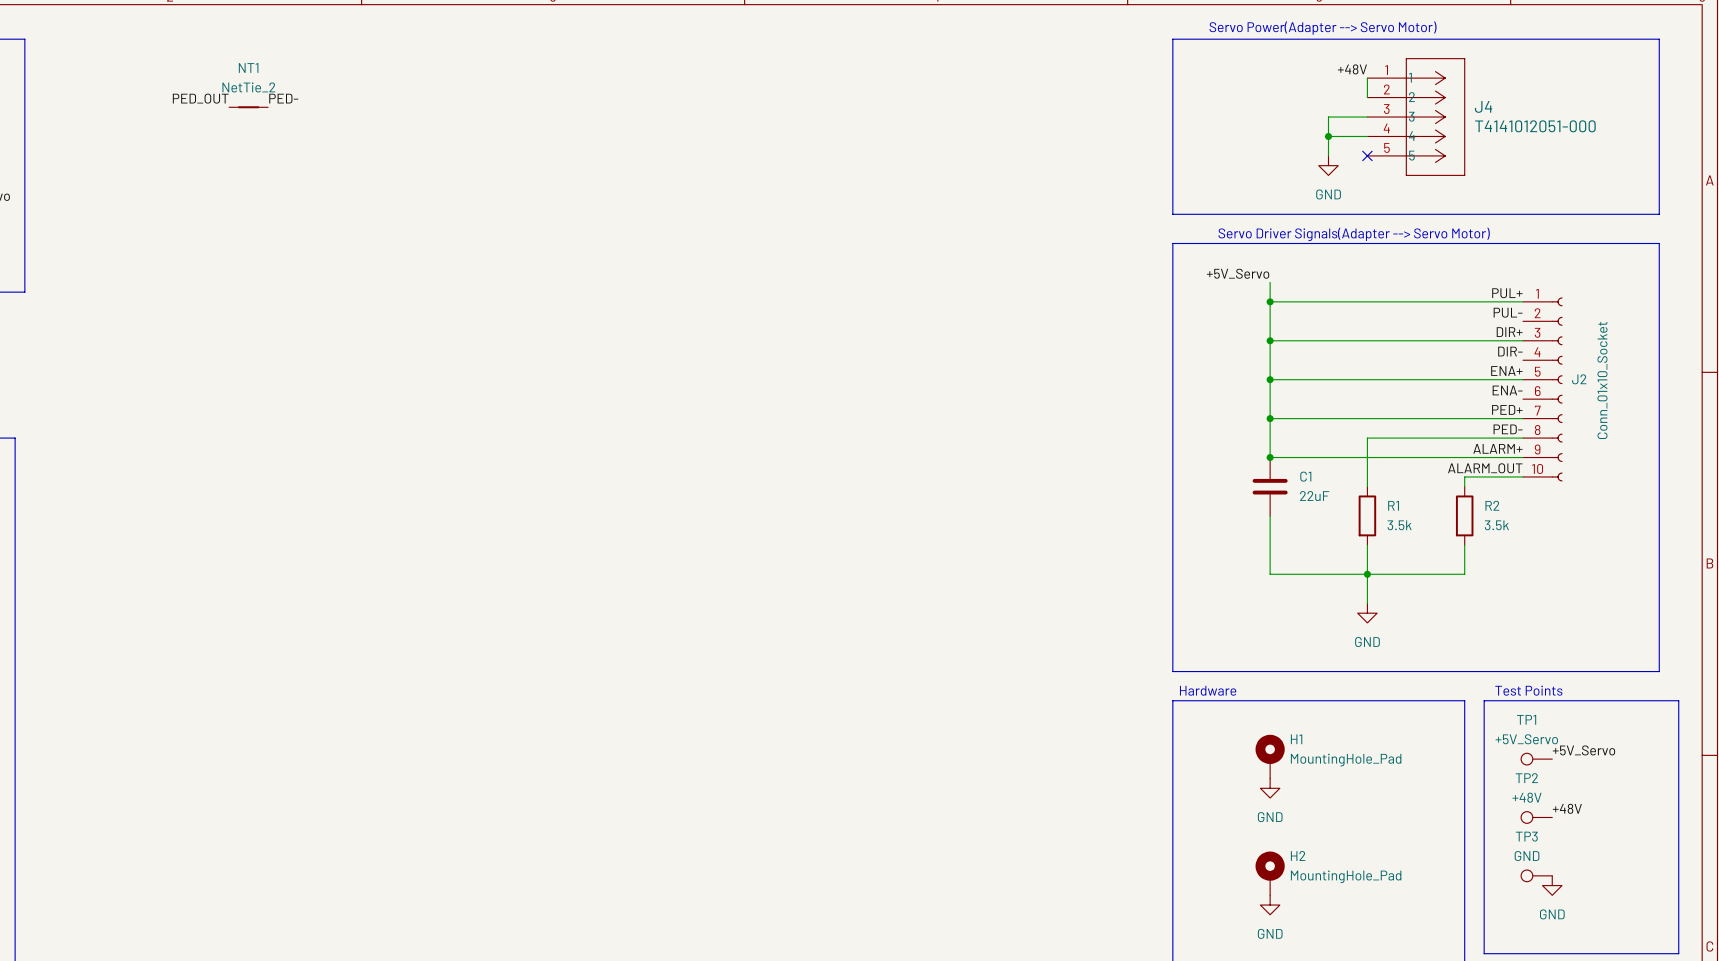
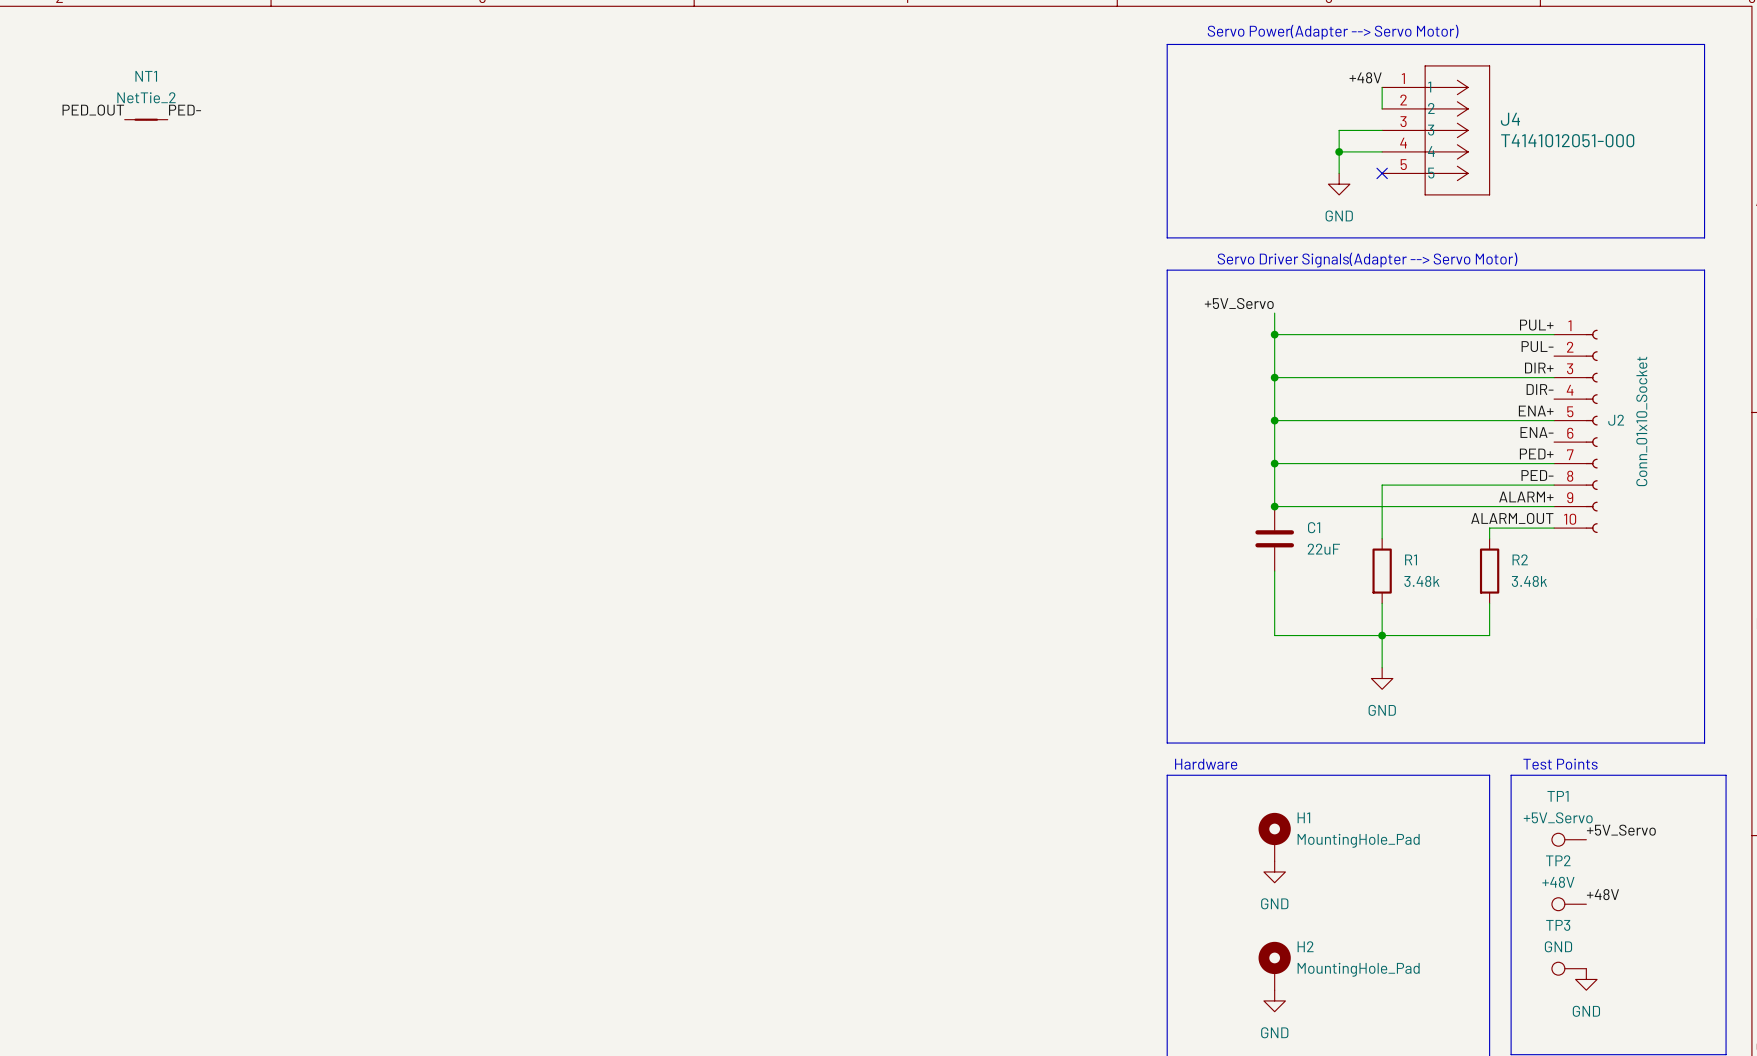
R1 value: 3.5k (1399, 525) -> 3.48k (1421, 581)
R2 value: 3.5k (1496, 525) -> 3.48k (1529, 581)

